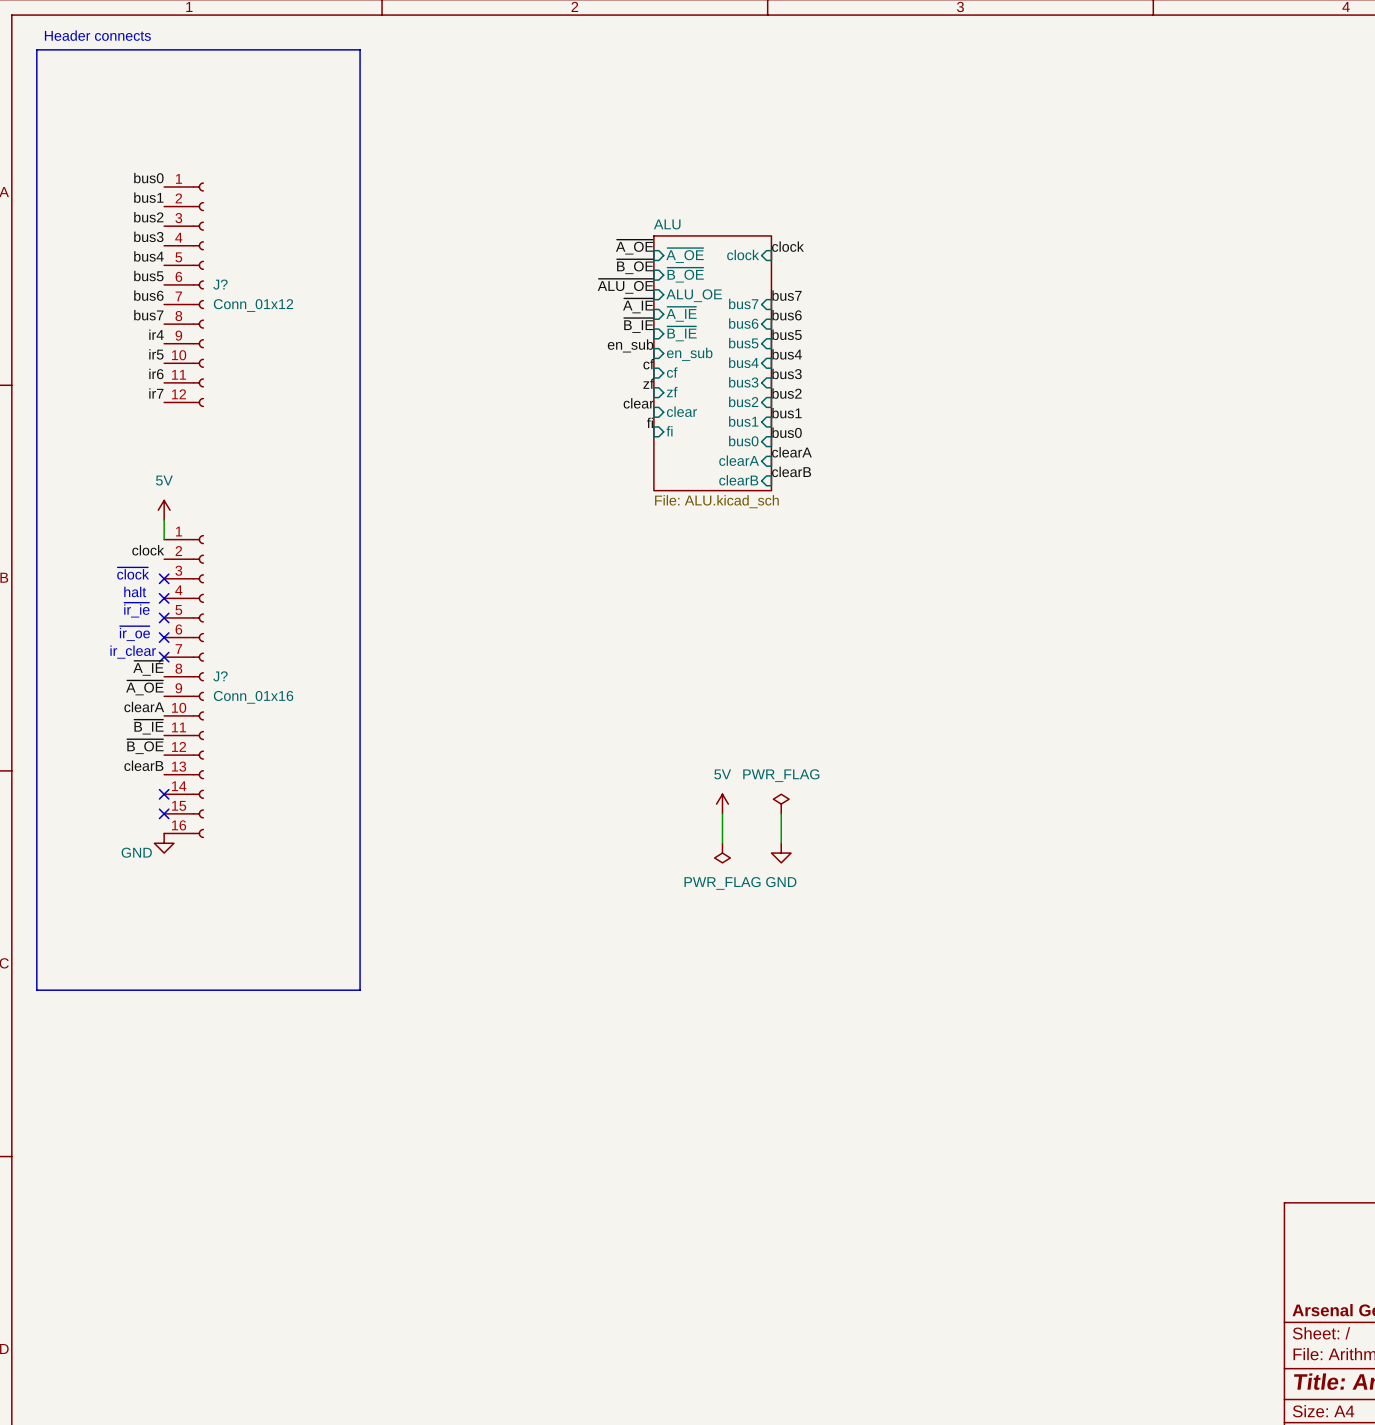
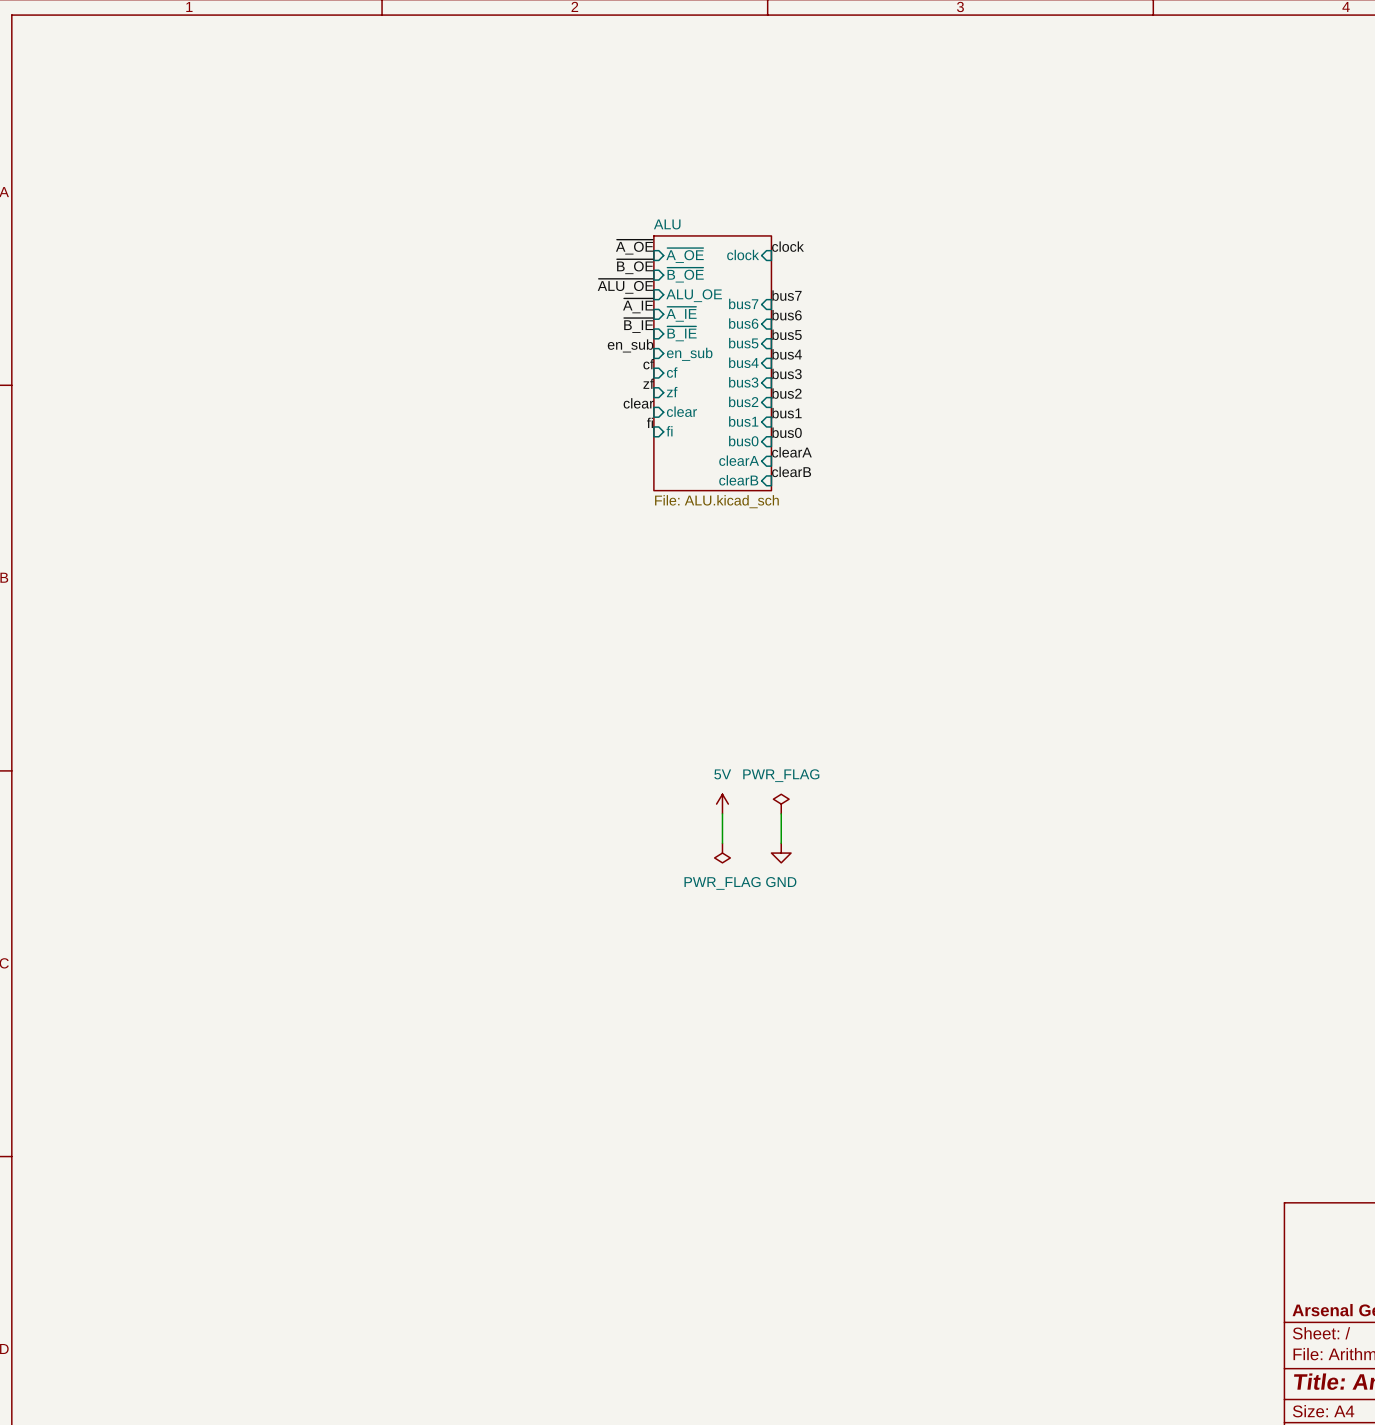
text: Header connects (97, 35) -> none
line: (36, 49) (360, 49) (360, 990) (36, 990) (36, 49) -> none
label: bus0 (148, 178) -> none
label: bus1 (148, 197) -> none
label: bus2 (148, 217) -> none
label: bus3 (148, 236) -> none
label: bus4 (148, 256) -> none
label: bus5 (148, 276) -> none
J?: Conn_01x12 (184, 294) -> none
label: bus6 (148, 295) -> none
label: bus7 (148, 315) -> none
label: ir4 (156, 334) -> none
label: ir5 (156, 354) -> none
label: ir6 (156, 373) -> none
label: ir7 (156, 393) -> none
power symbol: 5V (164, 510) -> none
wire: (164, 520) (164, 539) -> none
label: clock (148, 550) -> none
text: ~{clock} (133, 573) -> none
no-connect mark: (164, 578) -> none
text: halt (135, 591) -> none
no-connect mark: (164, 598) -> none
text: ~{ir_ie} (136, 610) -> none
no-connect mark: (164, 617) -> none
text: ~{ir_oe} (134, 633) -> none
no-connect mark: (164, 637) -> none
text: ir_clear (133, 652) -> none
no-connect mark: (164, 657) -> none
label: ~{A_IE} (148, 668) -> none
J?: Conn_01x16 (184, 686) -> none
label: ~{A_OE} (144, 687) -> none
label: clearA (144, 706) -> none
label: ~{B_IE} (148, 727) -> none
label: ~{B_OE} (145, 746) -> none
label: clearB (143, 765) -> none
no-connect mark: (164, 794) -> none
no-connect mark: (164, 813) -> none
power symbol: GND (164, 843) -> none

